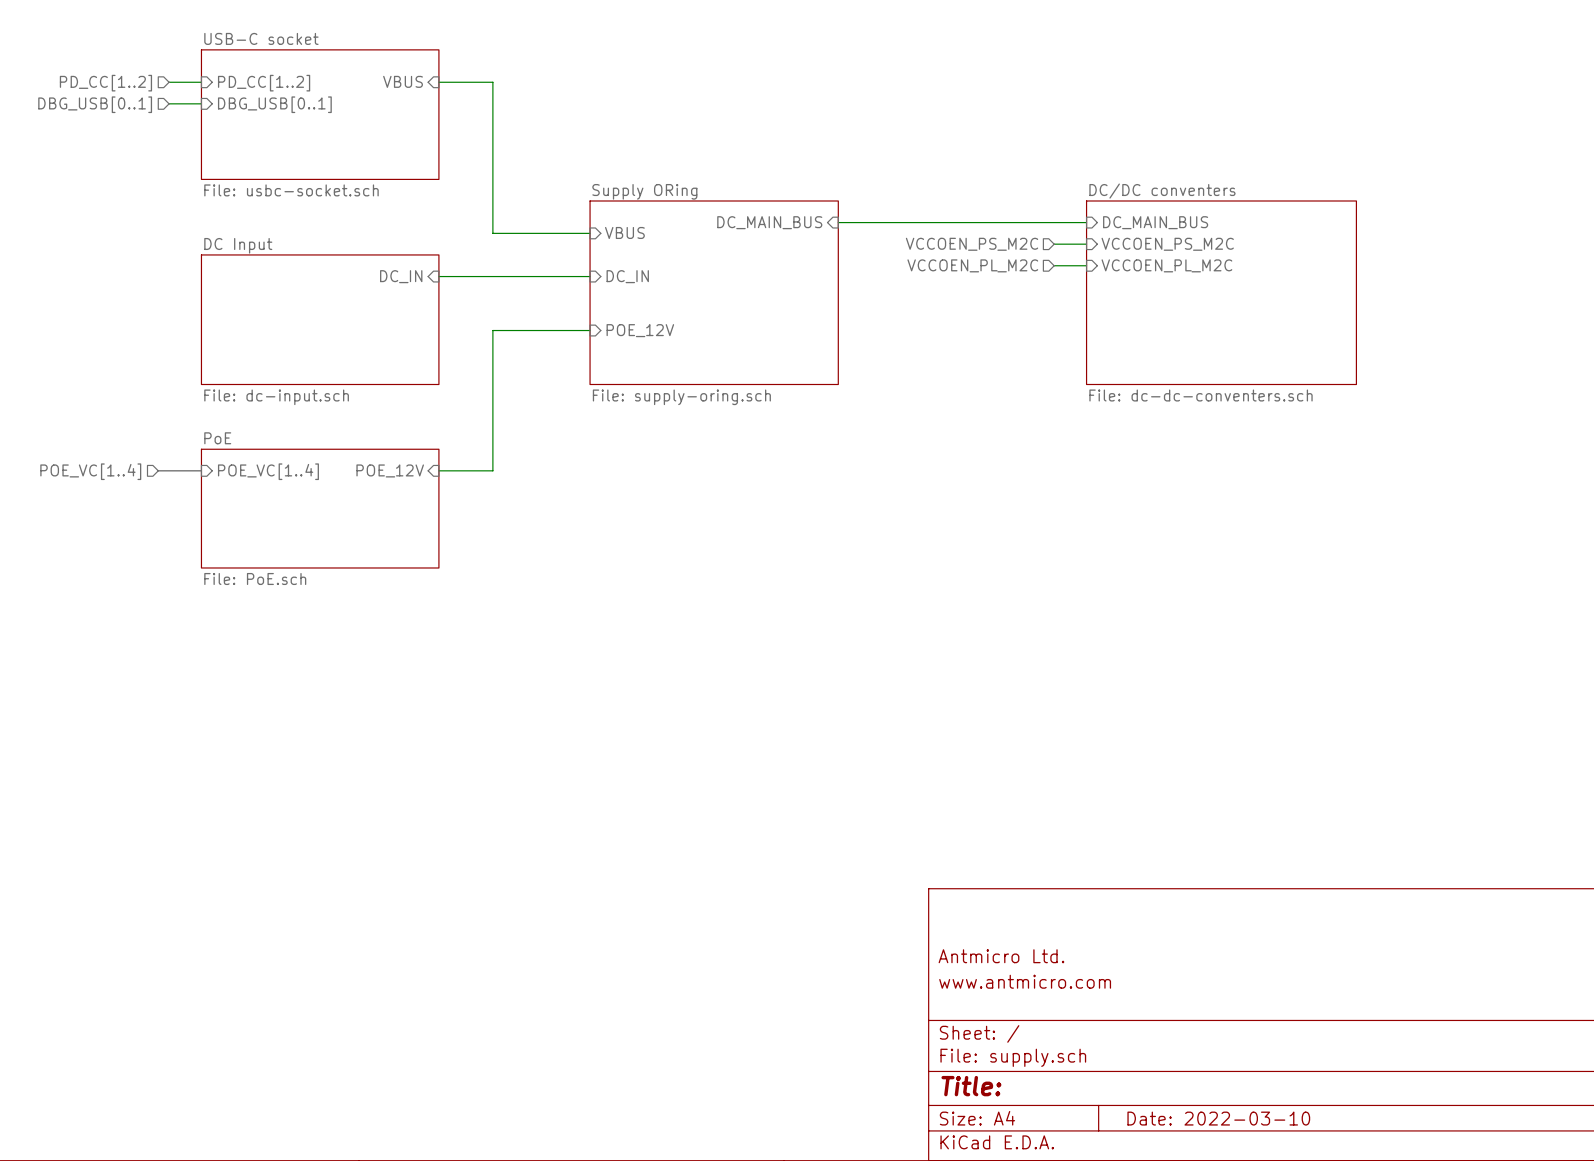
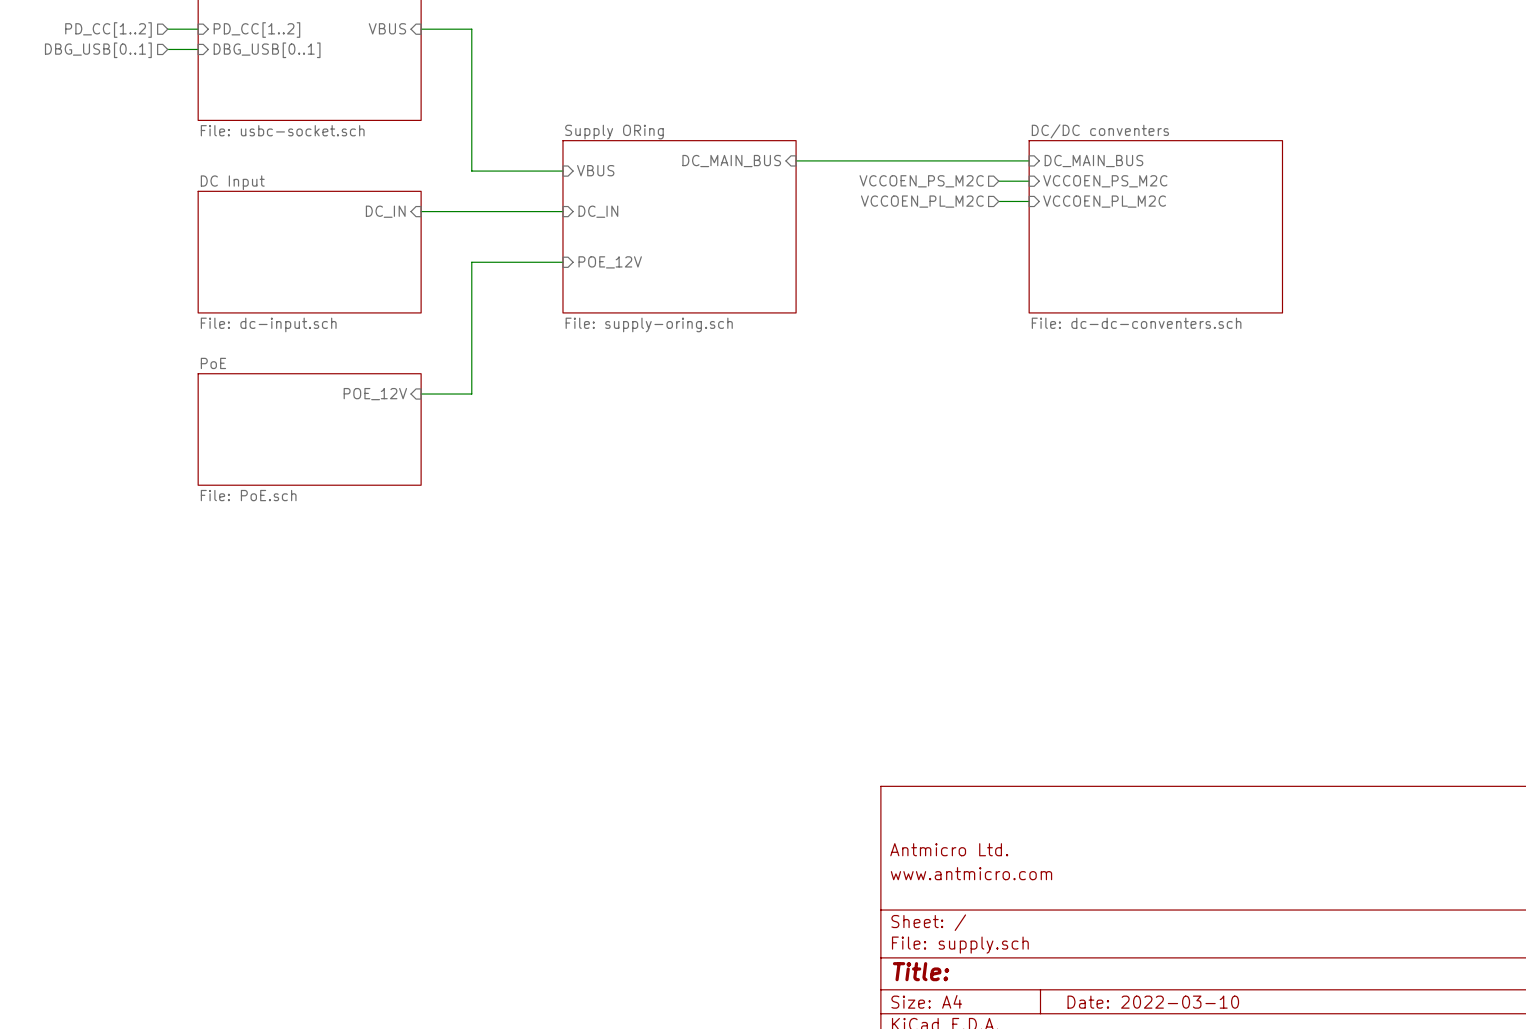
bus: (158, 470) (201, 470) -> none
hierarchical label: POE_VC[1..4] (90, 471) -> none
sheet pin: POE_VC[1..4] (268, 471) -> none

